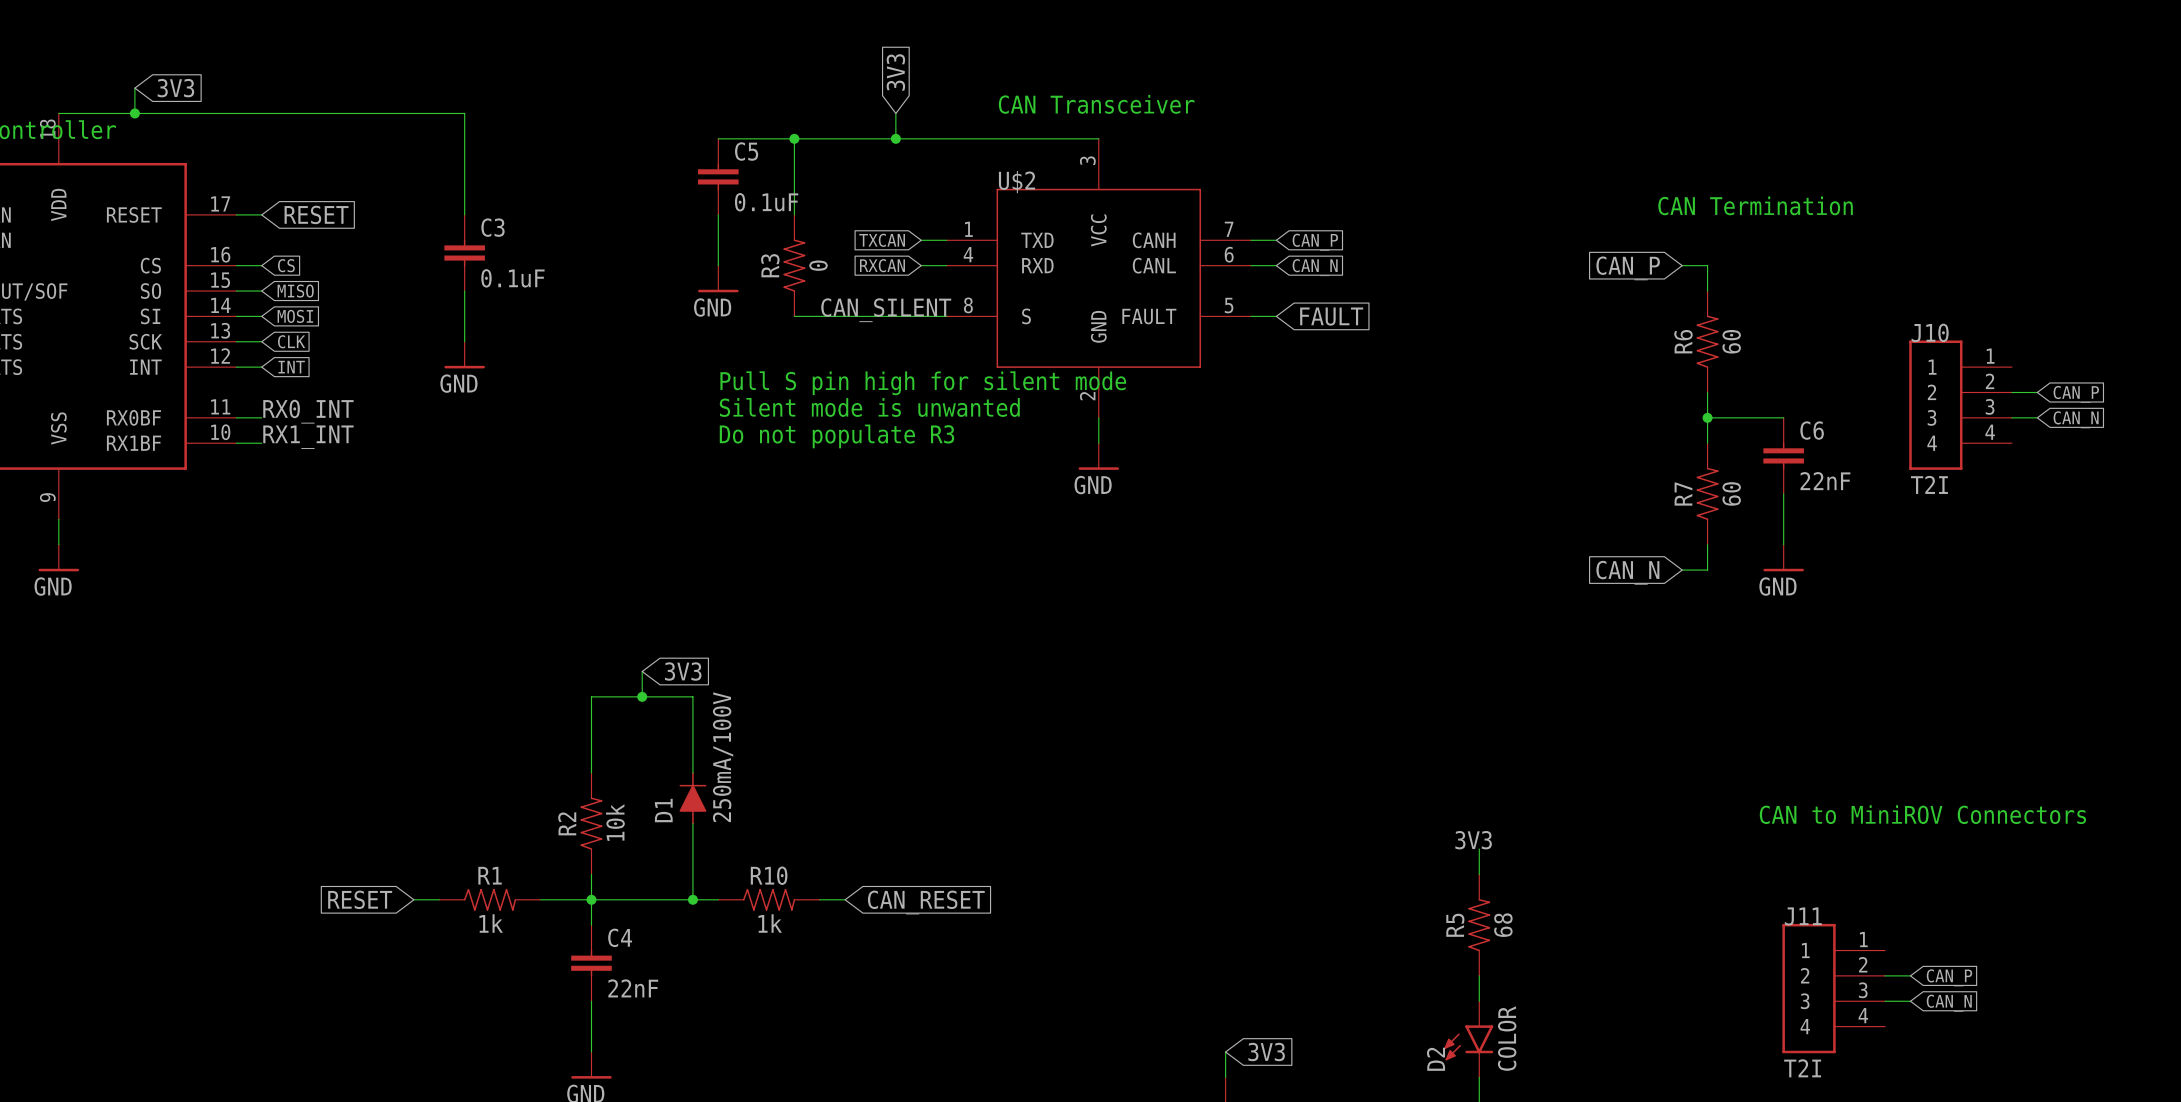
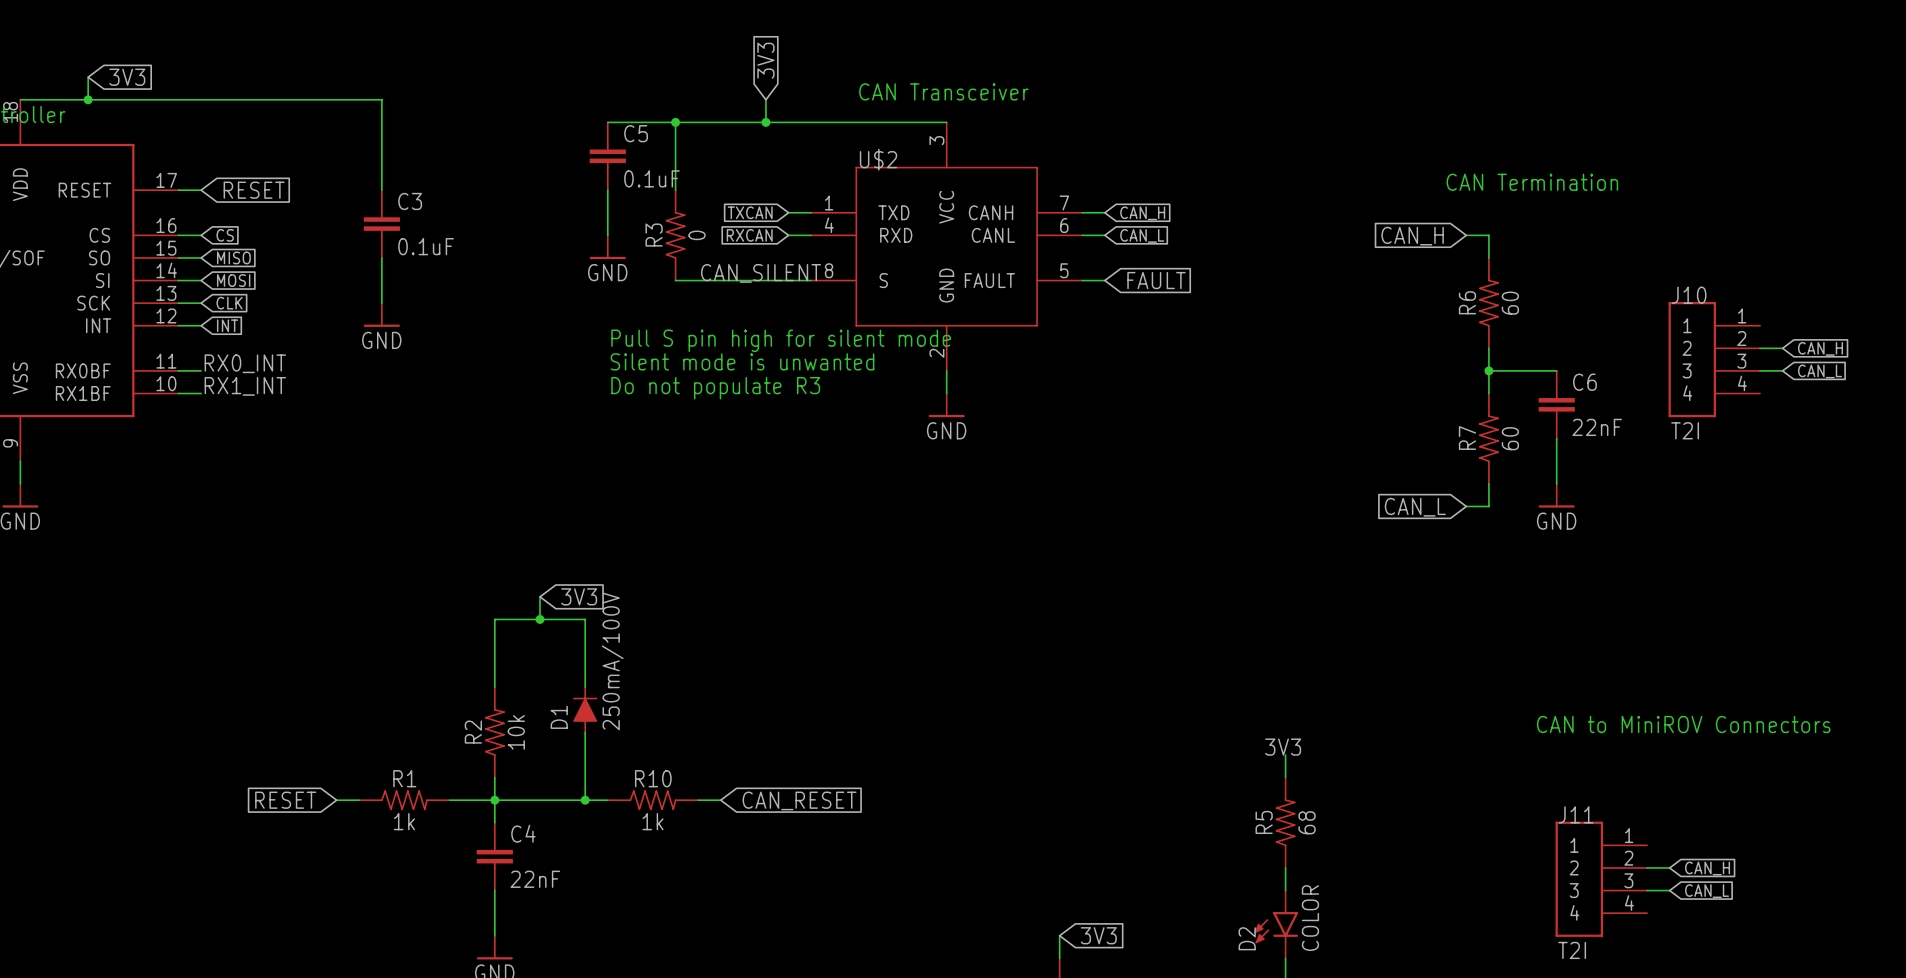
global label: CAN_P (1315, 242) -> CAN_H (1142, 213)
global label: CAN_N (1315, 267) -> CAN_L (1142, 235)
global label: CAN_P (1628, 268) -> CAN_H (1412, 236)
global label: CAN_P (2076, 394) -> CAN_H (1820, 348)
global label: CAN_N (2076, 419) -> CAN_L (1820, 371)
global label: CAN_N (1627, 572) -> CAN_L (1415, 507)
global label: CAN_P (1949, 977) -> CAN_H (1707, 868)
global label: CAN_N (1949, 1003) -> CAN_L (1707, 891)

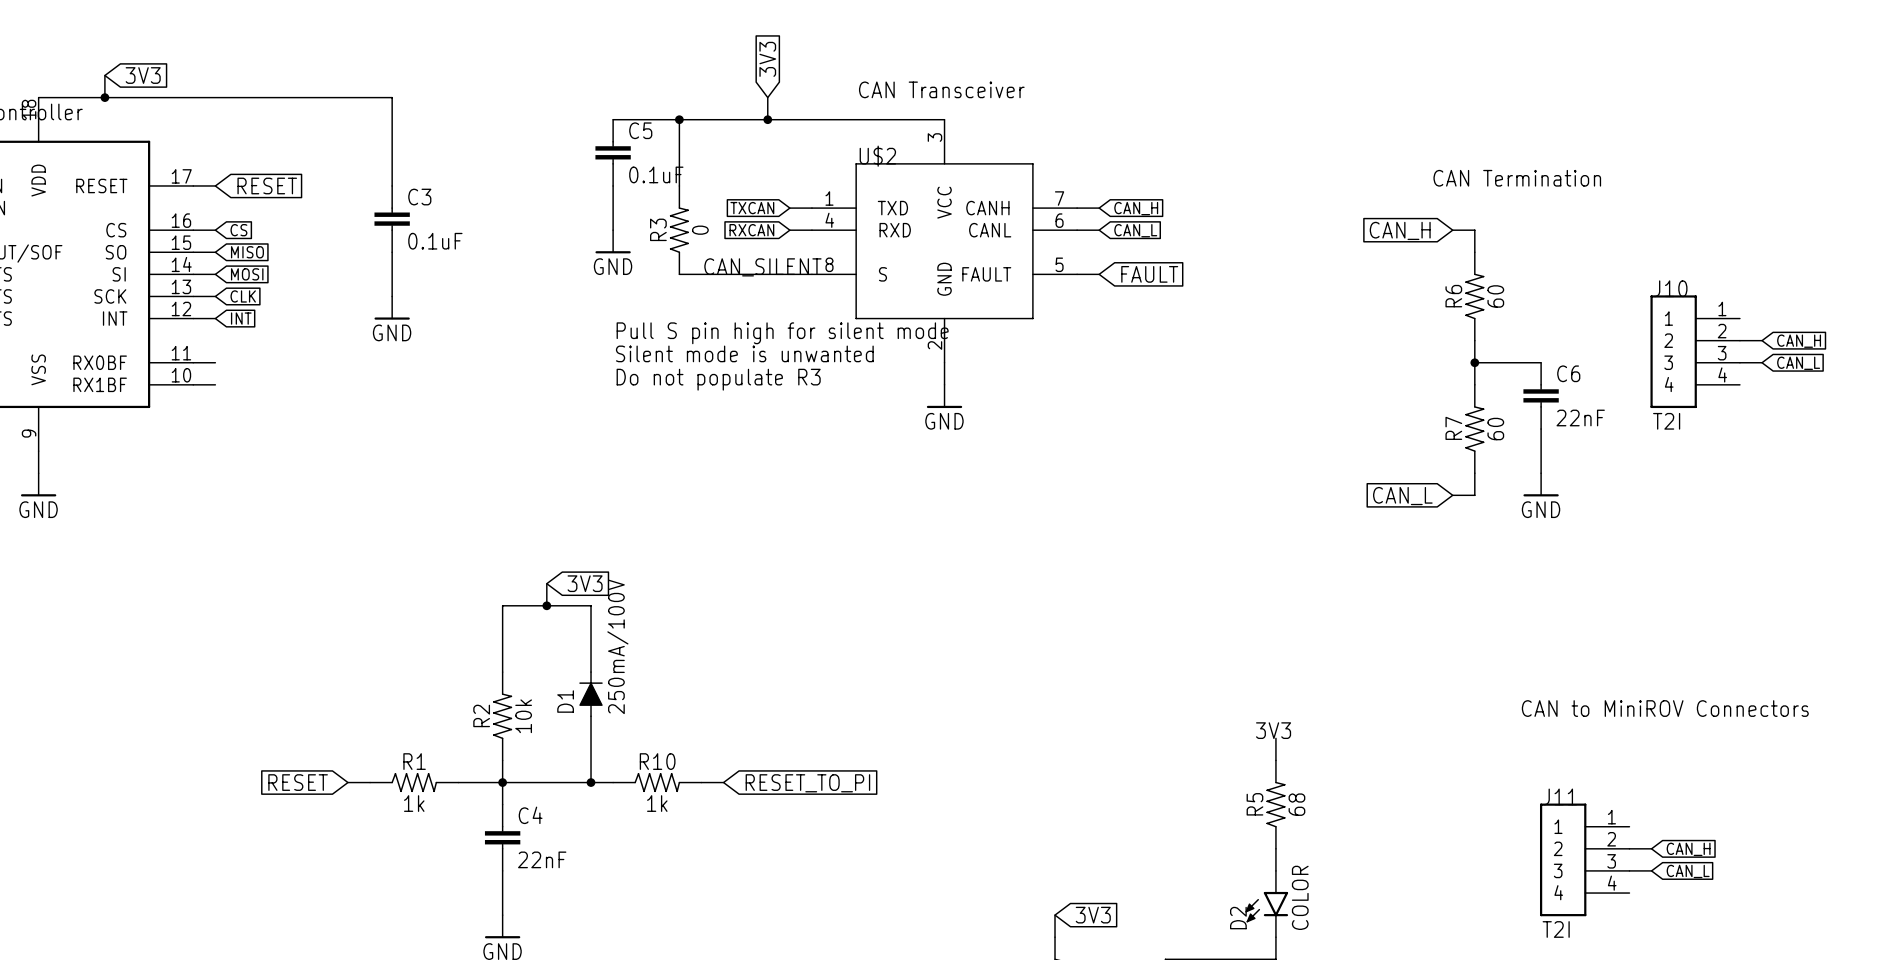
label: RX0_INT (245, 363) -> none
label: RX1_INT (245, 386) -> none
global label: CAN_RESET (799, 800) -> RESET_TO_PI (807, 783)

